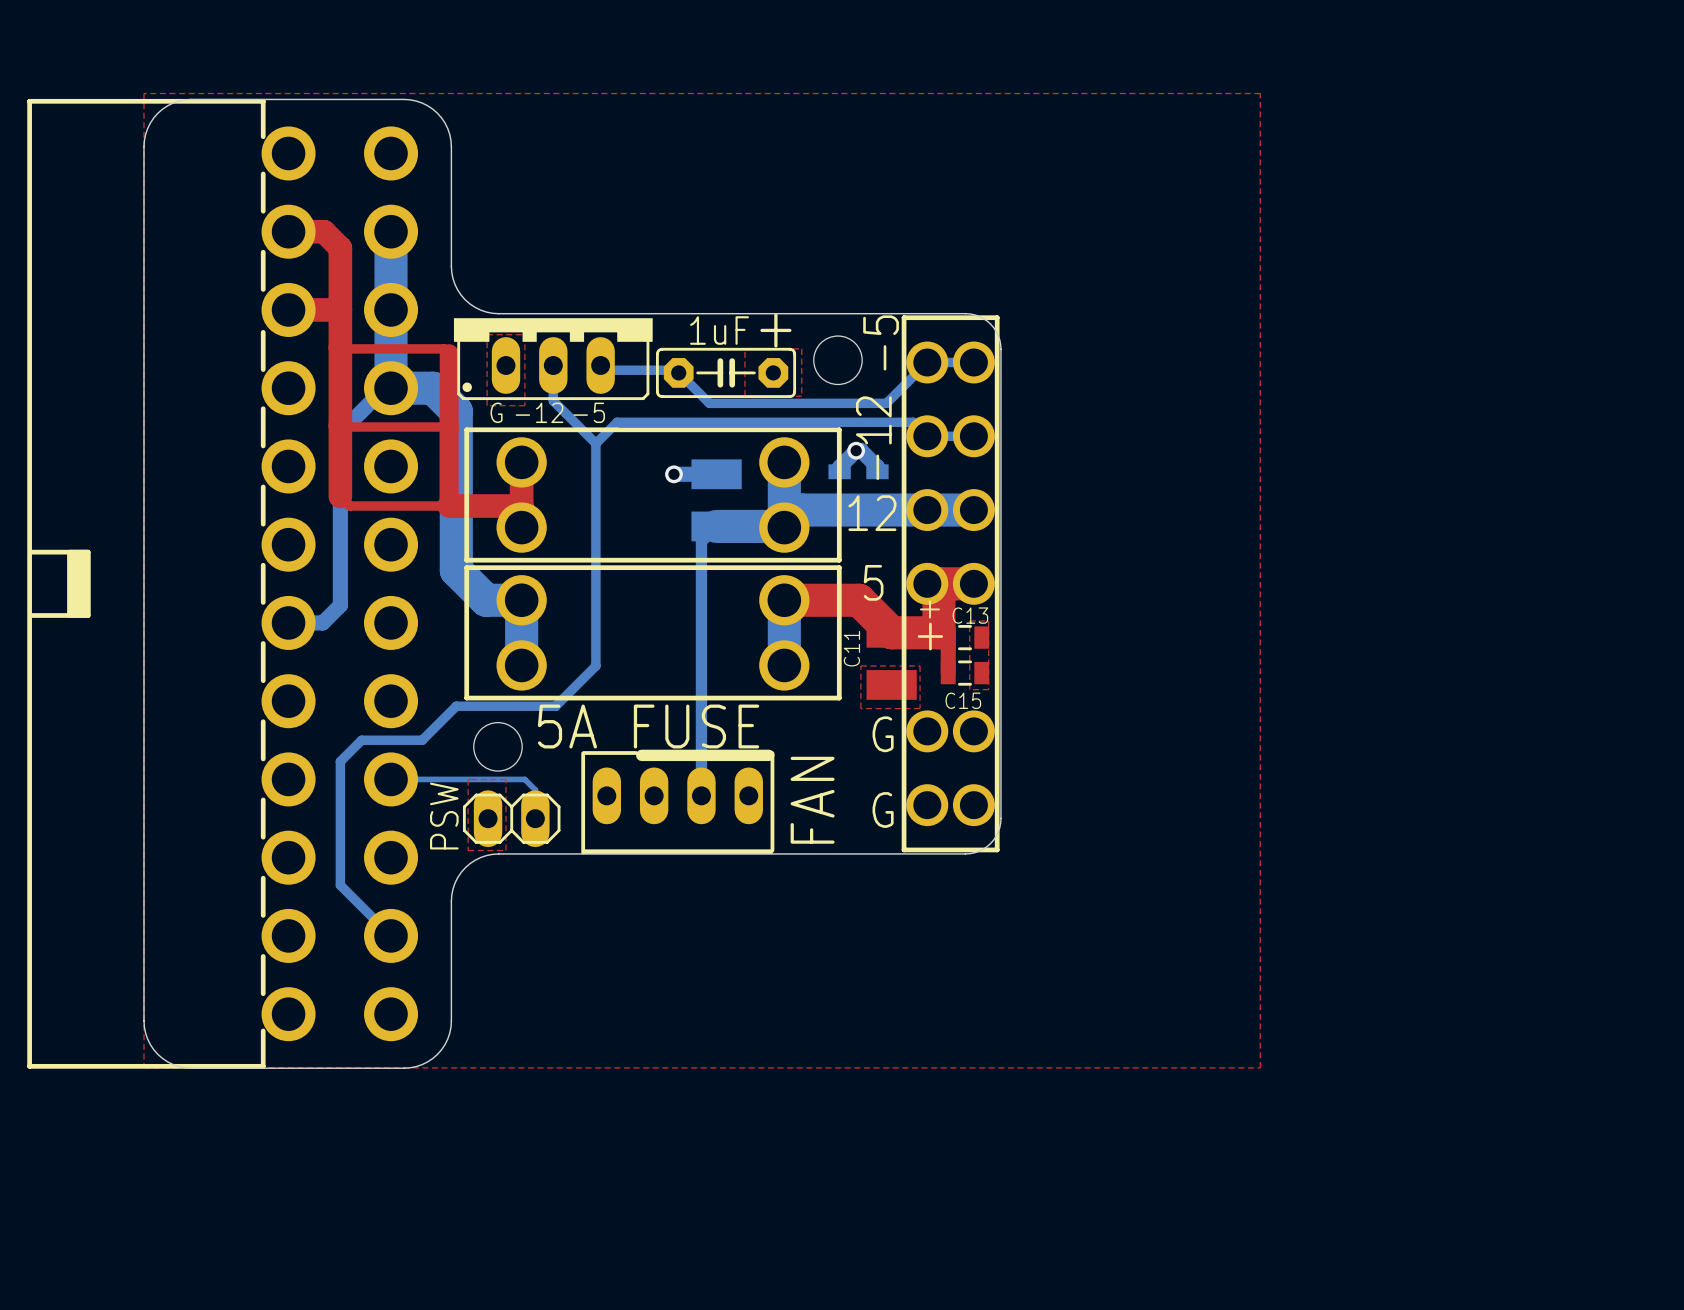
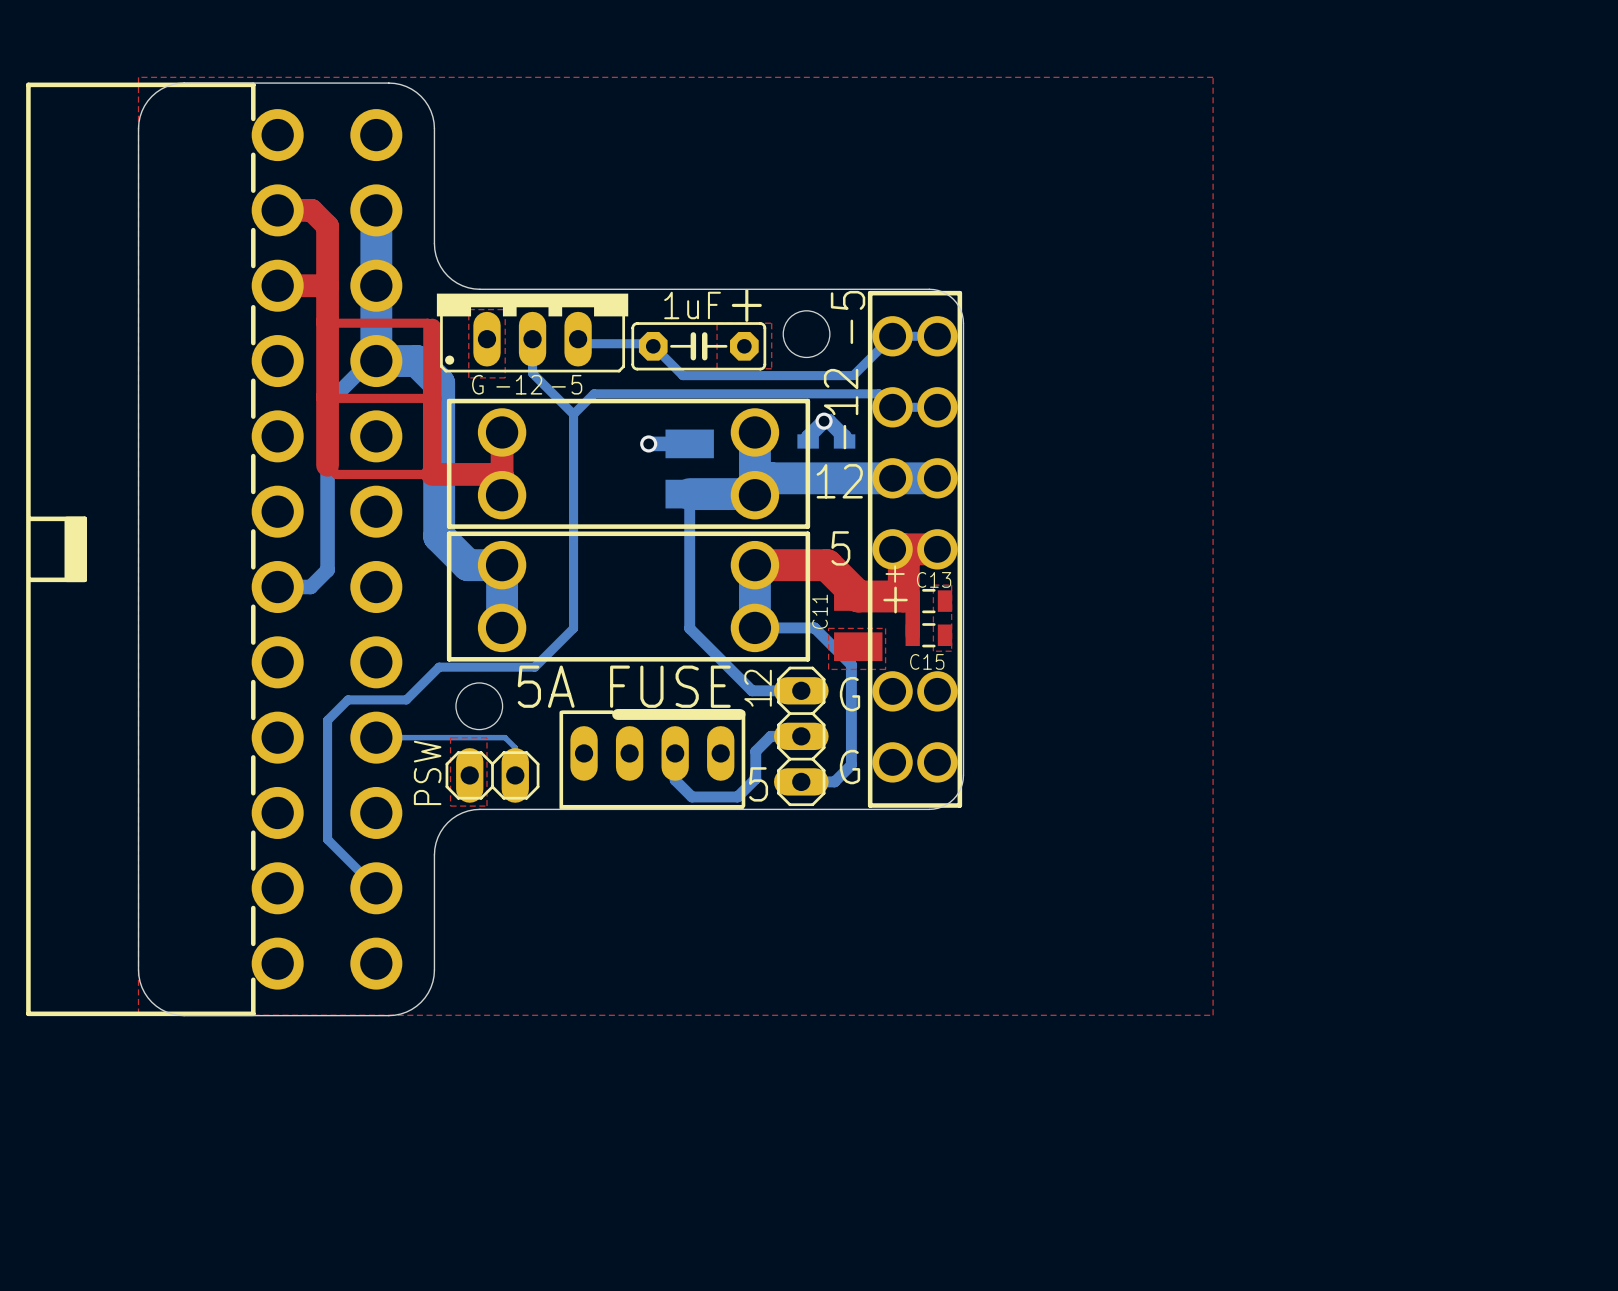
bottom track: (716, 526) (701, 541) (701, 795) -> (689, 494) (689, 628) (752, 690) (801, 690)
bottom track: none -> (754, 627) (814, 627) (851, 664) (851, 765) (834, 781) (801, 781)
text: none -> 12 (758, 688)
bottom track: none -> (801, 736) (770, 736) (755, 751) (755, 778) (737, 796) (691, 796) (675, 780) (675, 753)
part: none -> (801, 736)
text: FAN (812, 800) -> none
text: none -> 5 (758, 784)

